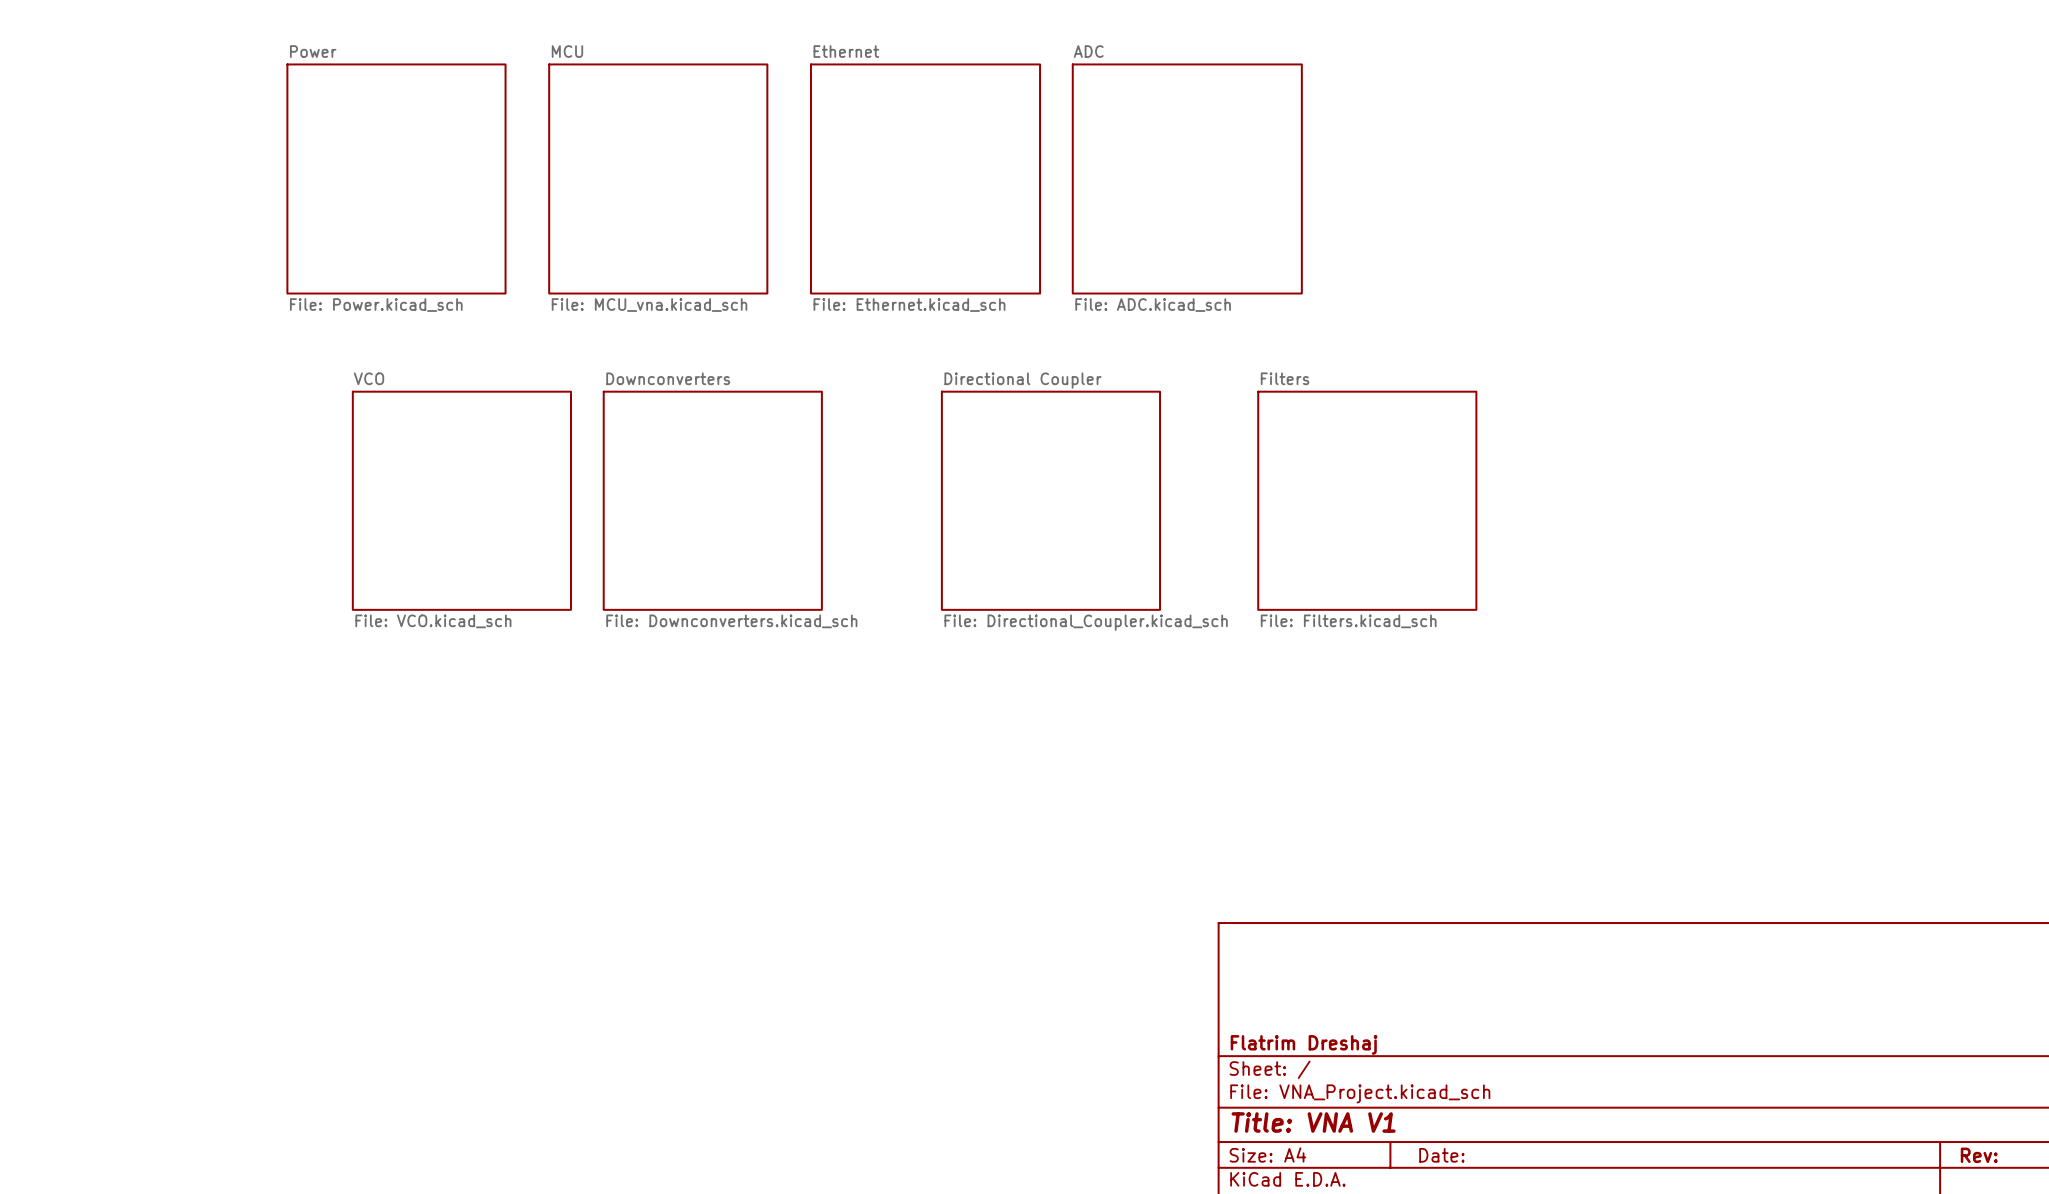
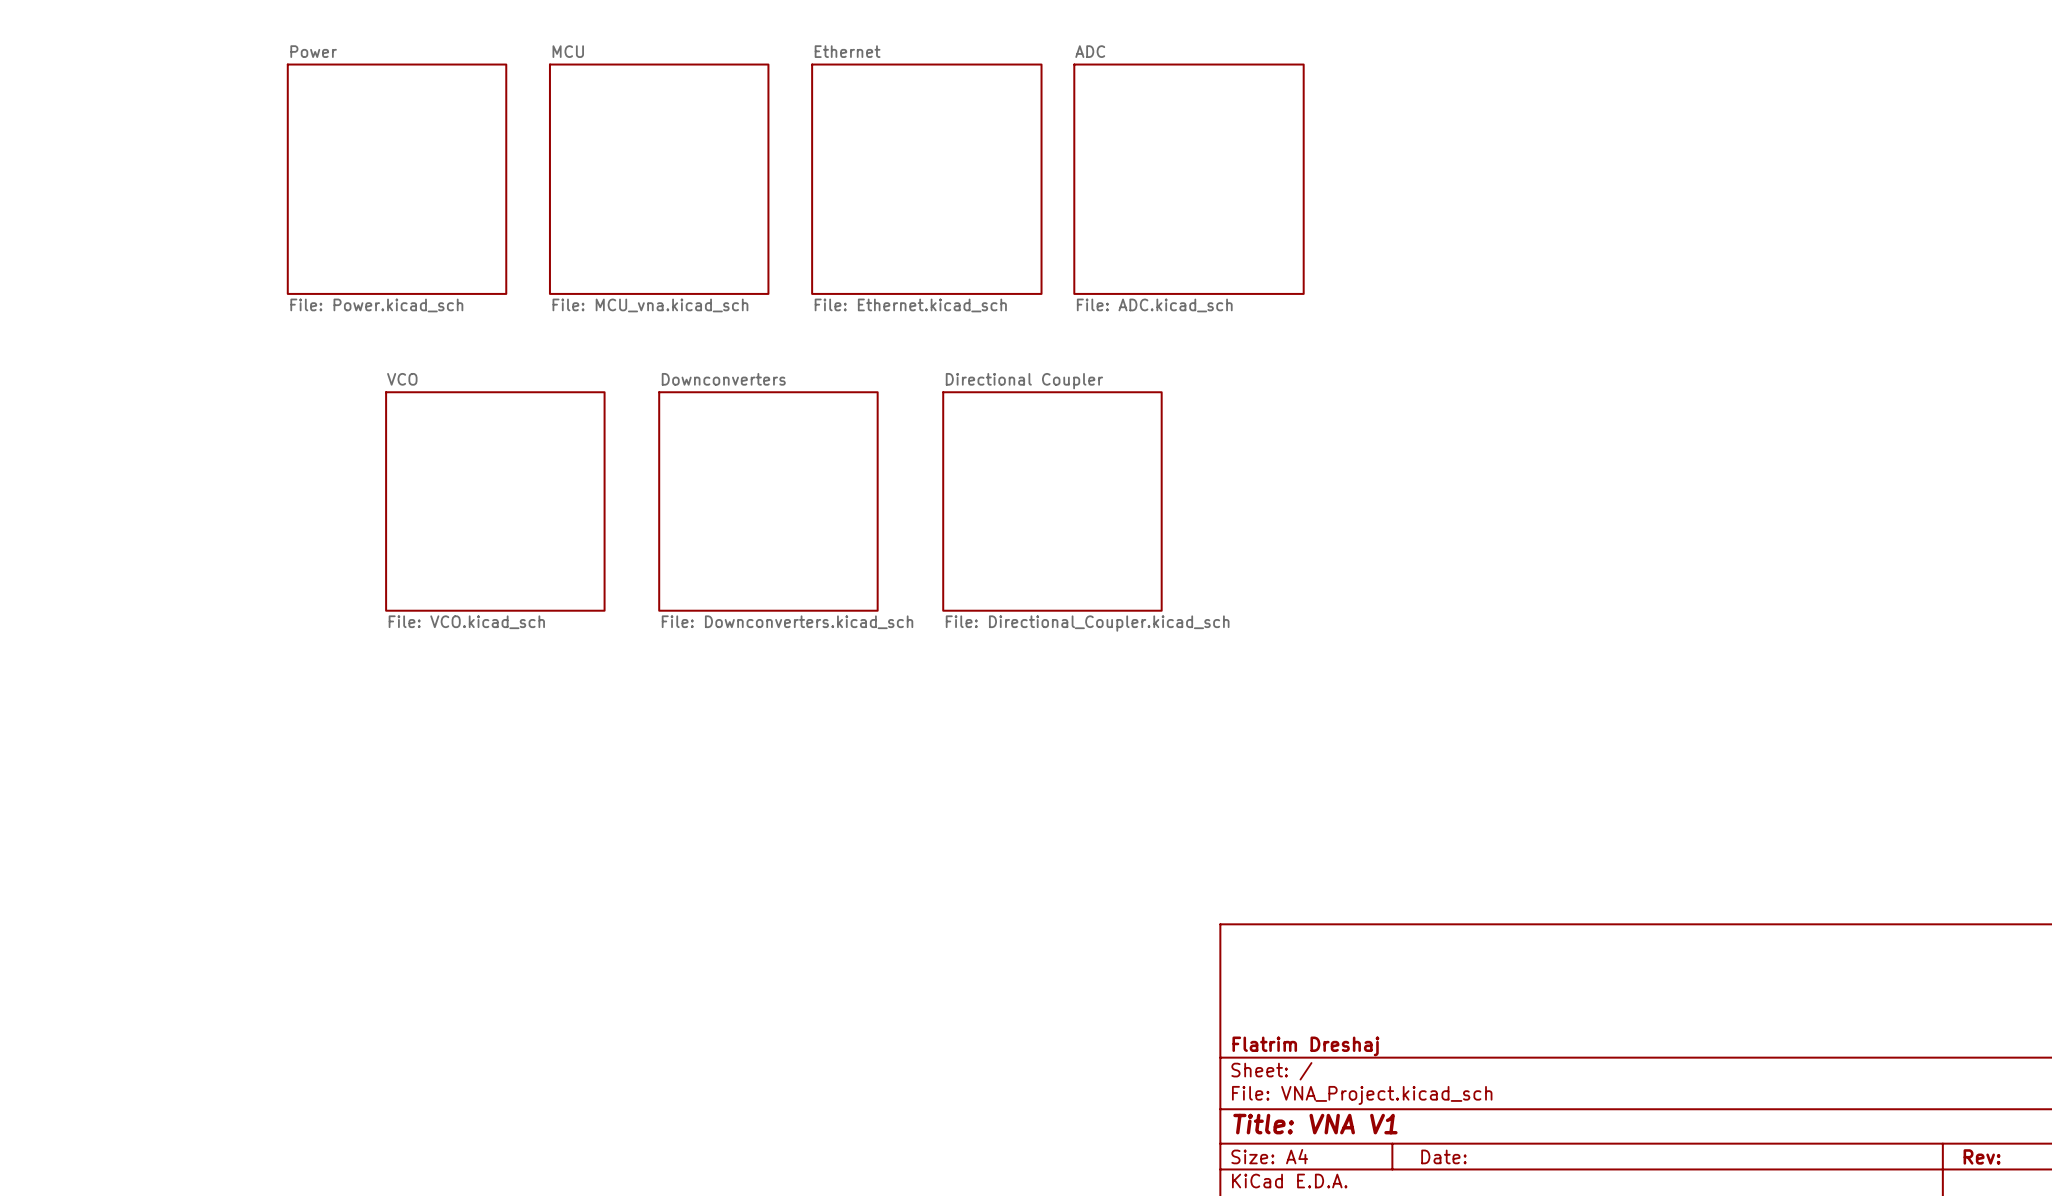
sheet VCO position: (461, 500) -> (495, 501)
sheet Downconverters position: (712, 500) -> (768, 501)
sheet Filters: File: Filters.kicad_sch (1367, 500) -> none

